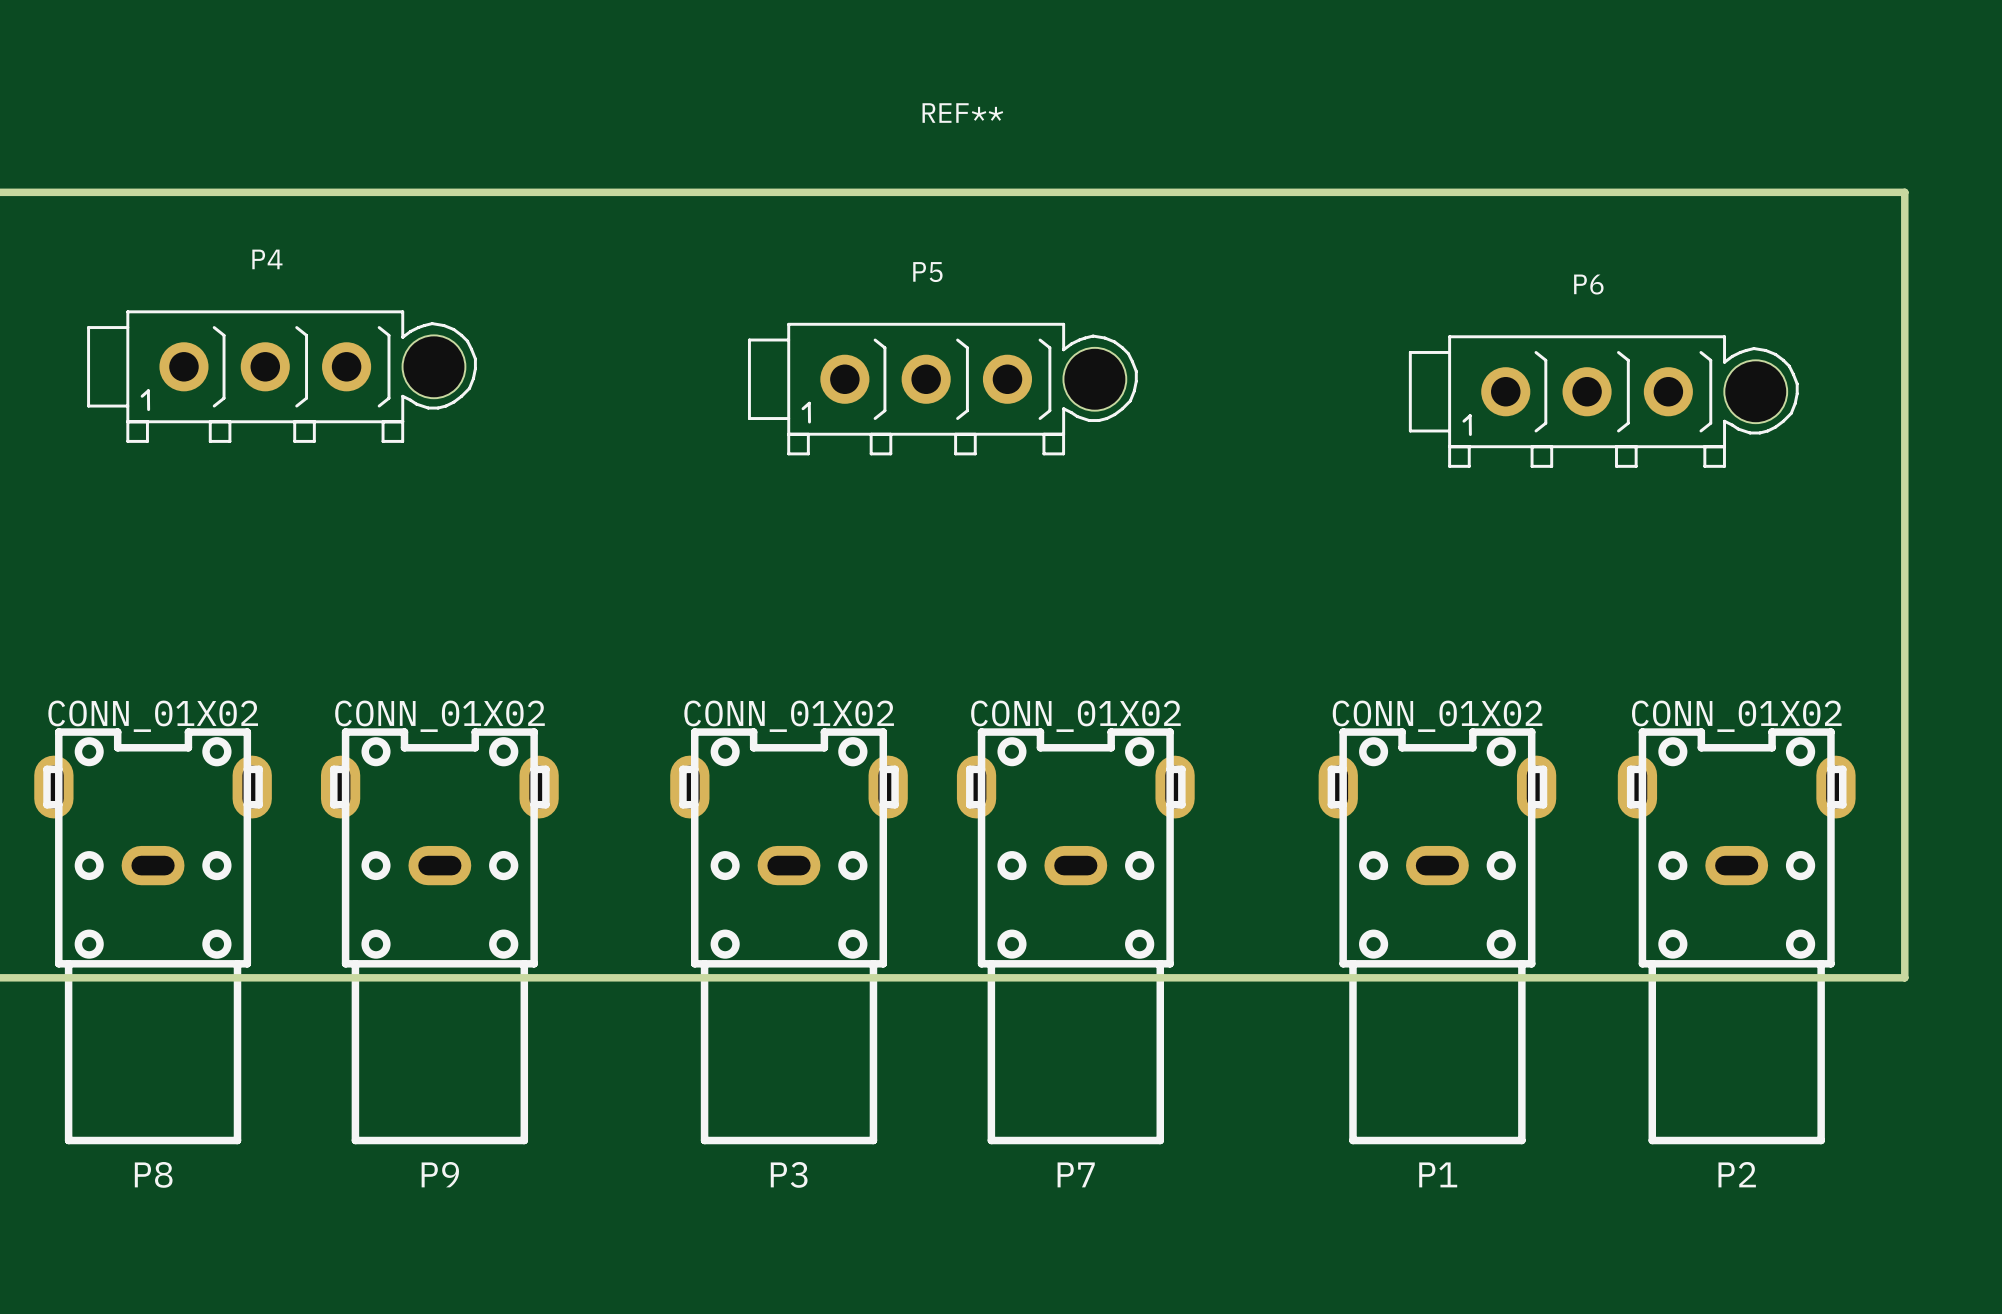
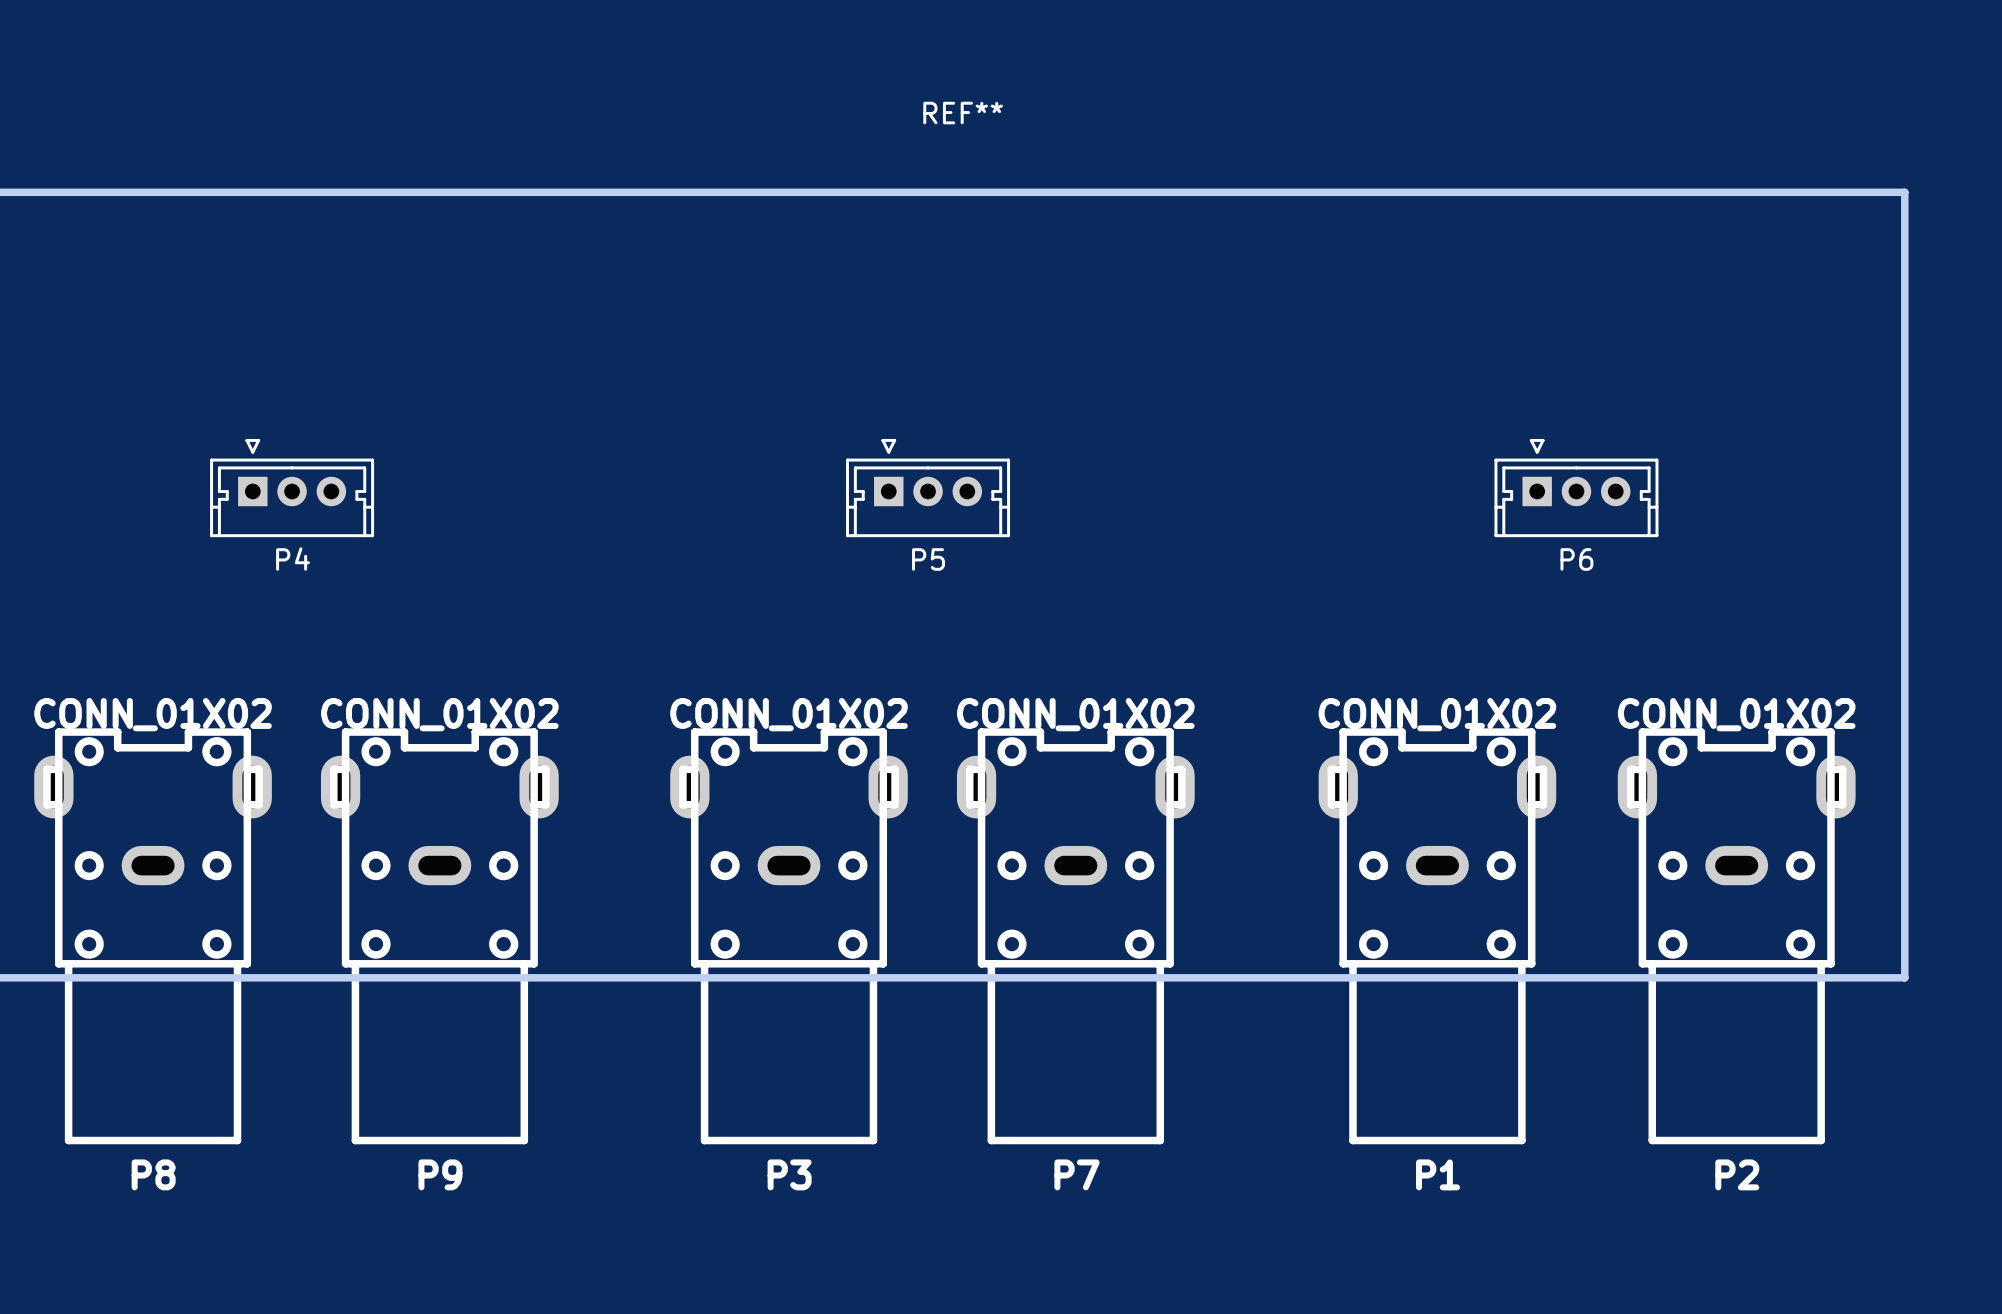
P4 name position: P4 (267, 259) -> P4 (293, 559)
P5 name position: P5 (927, 272) -> P5 (928, 559)
P6 name position: P6 (1588, 284) -> P6 (1576, 559)
P4 footprint: [87, 310, 477, 443] -> [210, 438, 375, 538]
P5 footprint: [747, 322, 1138, 456] -> [846, 438, 1011, 538]
P6 footprint: [1408, 335, 1799, 468] -> [1494, 438, 1659, 538]

